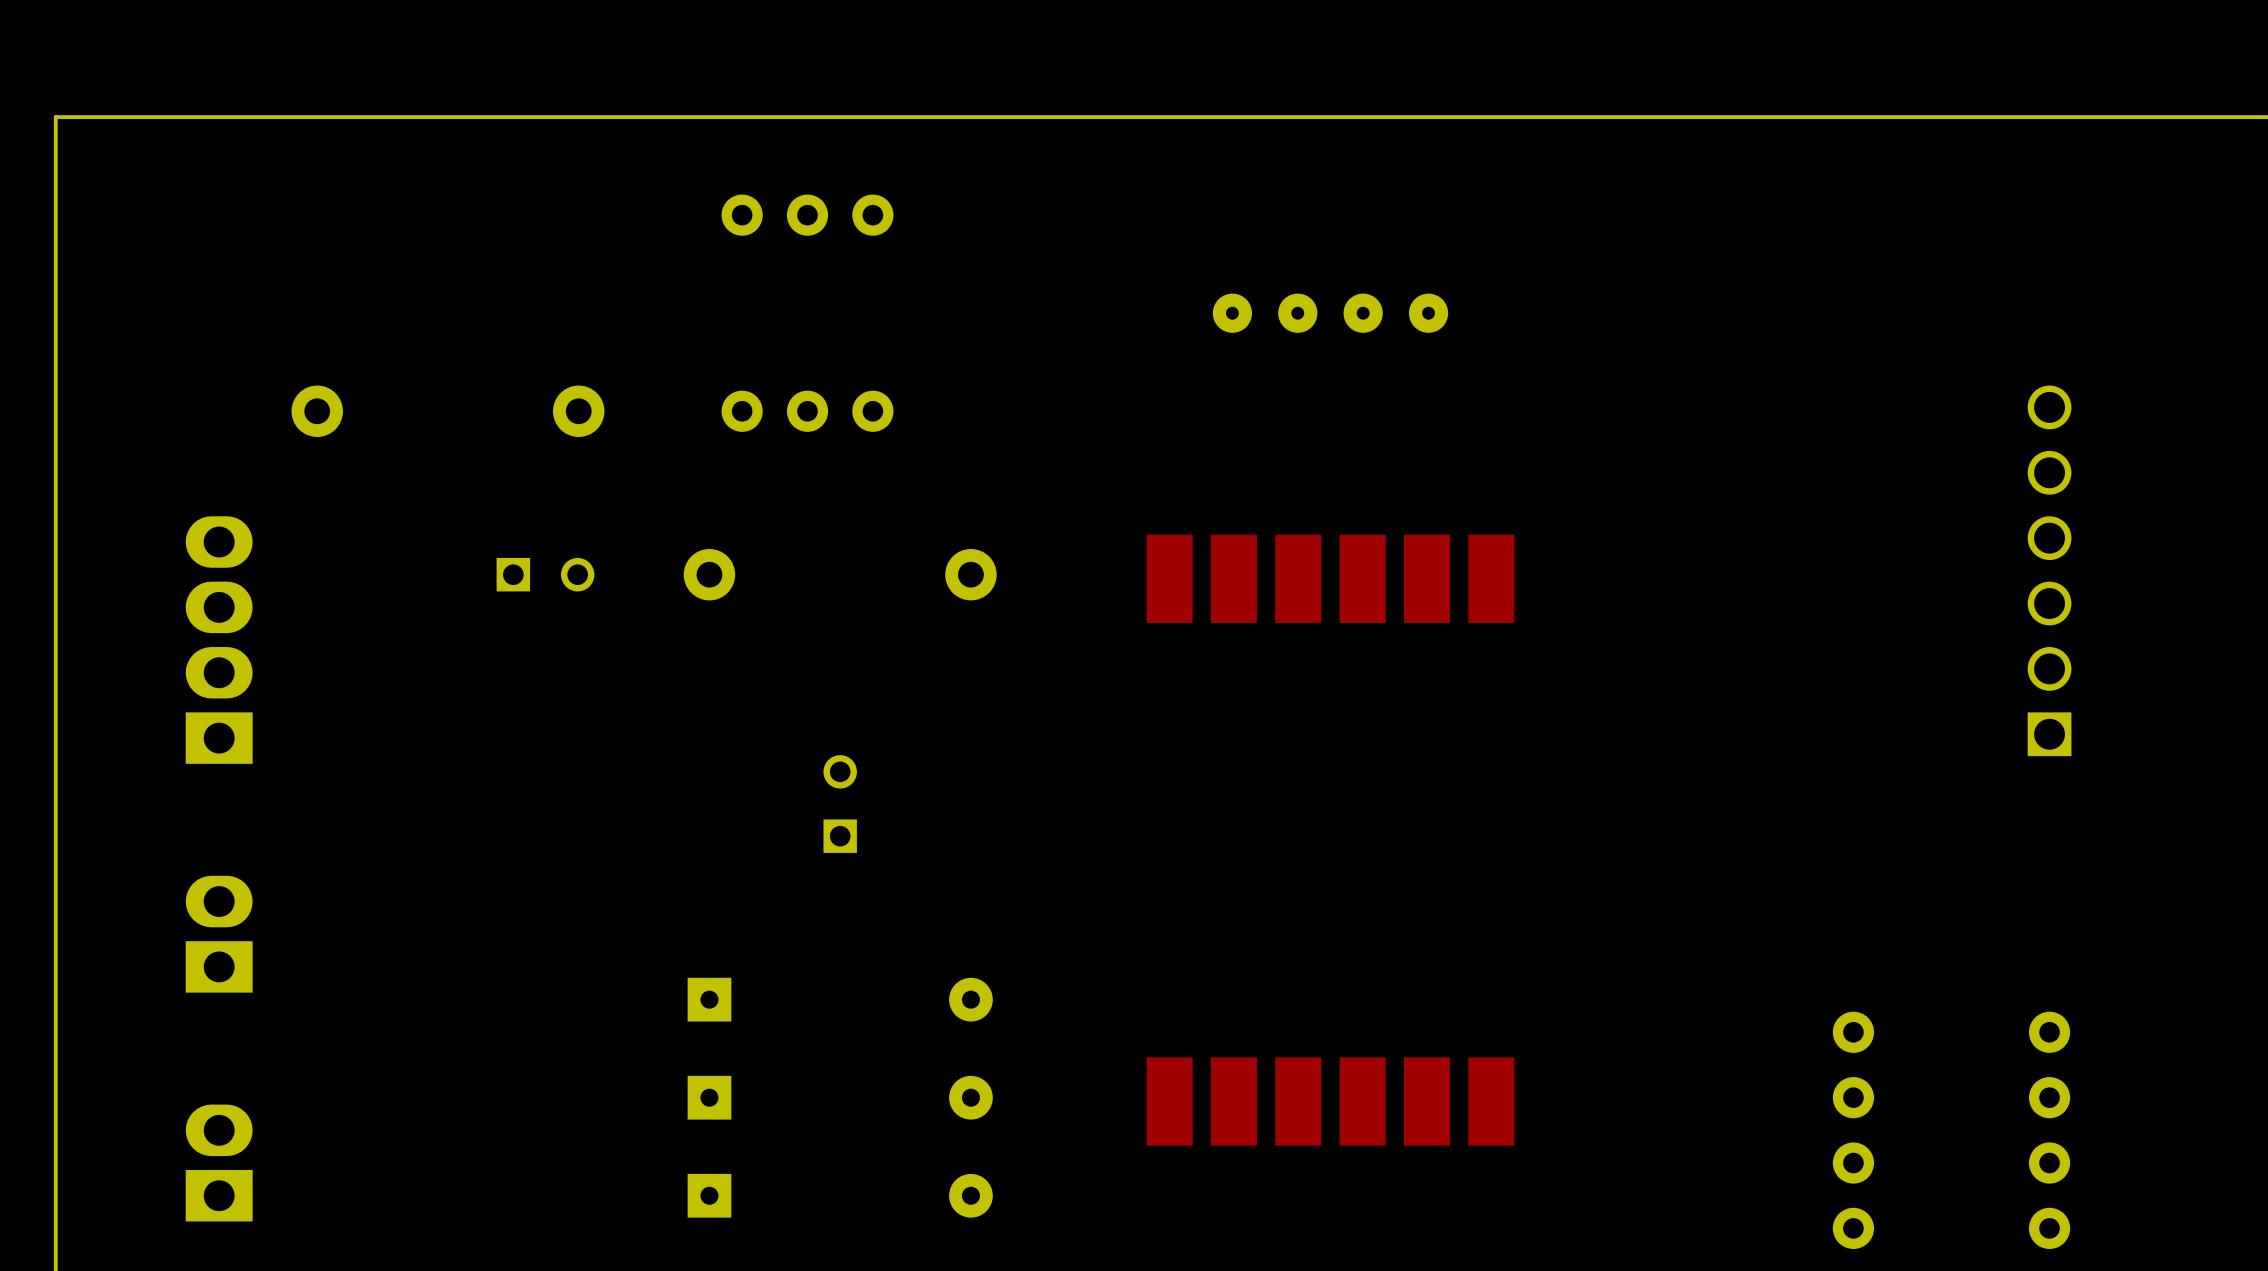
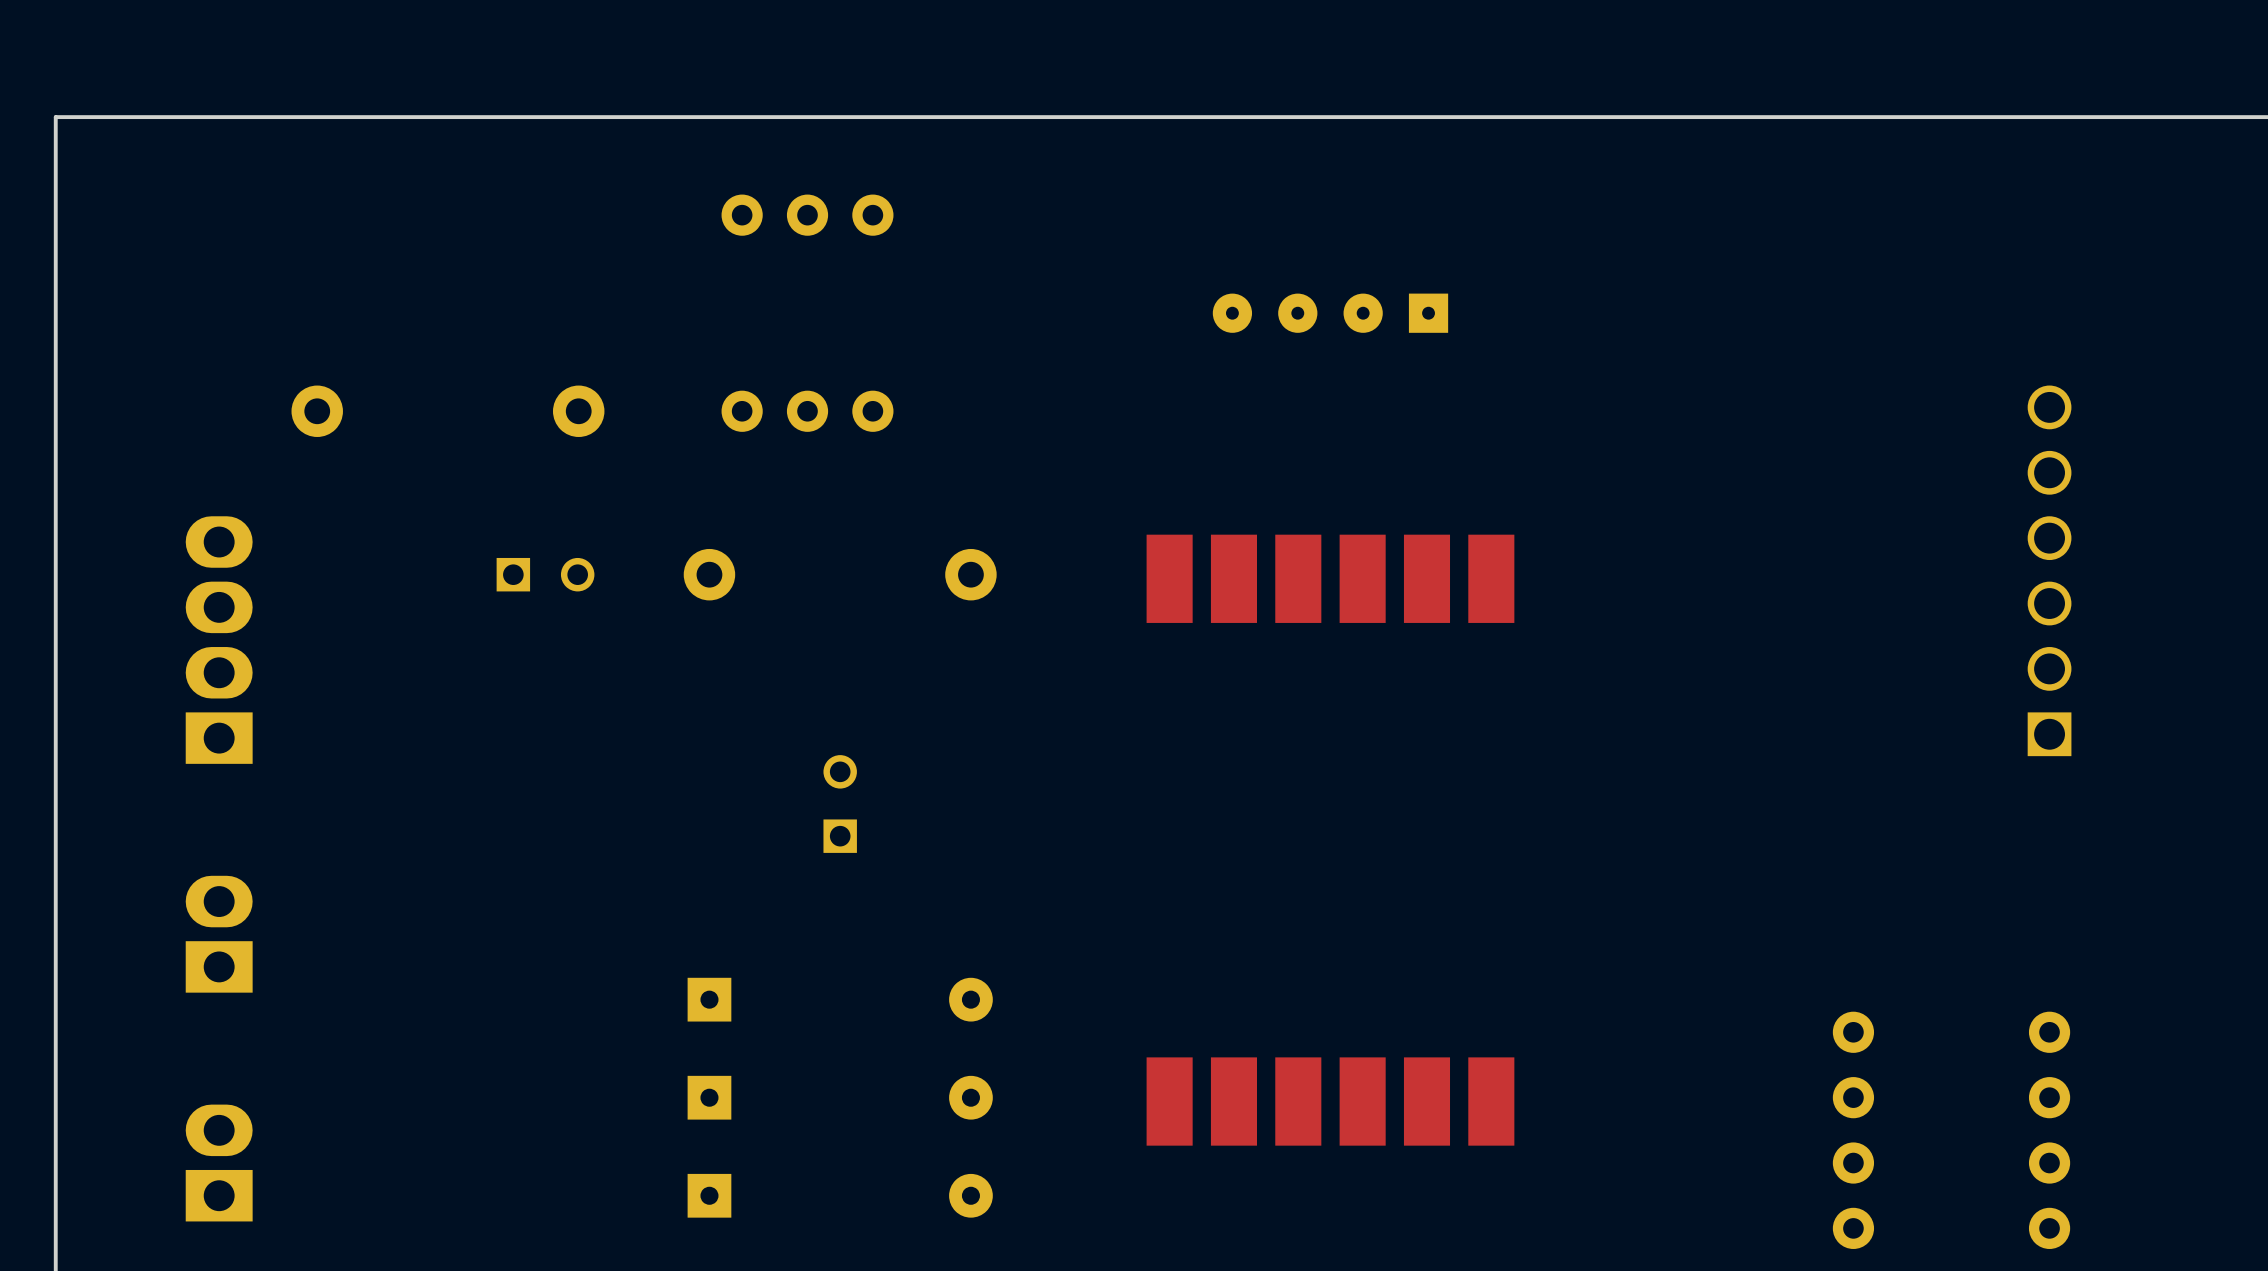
part footprint: [1212, 293, 1449, 333] -> [1212, 293, 1449, 333]

